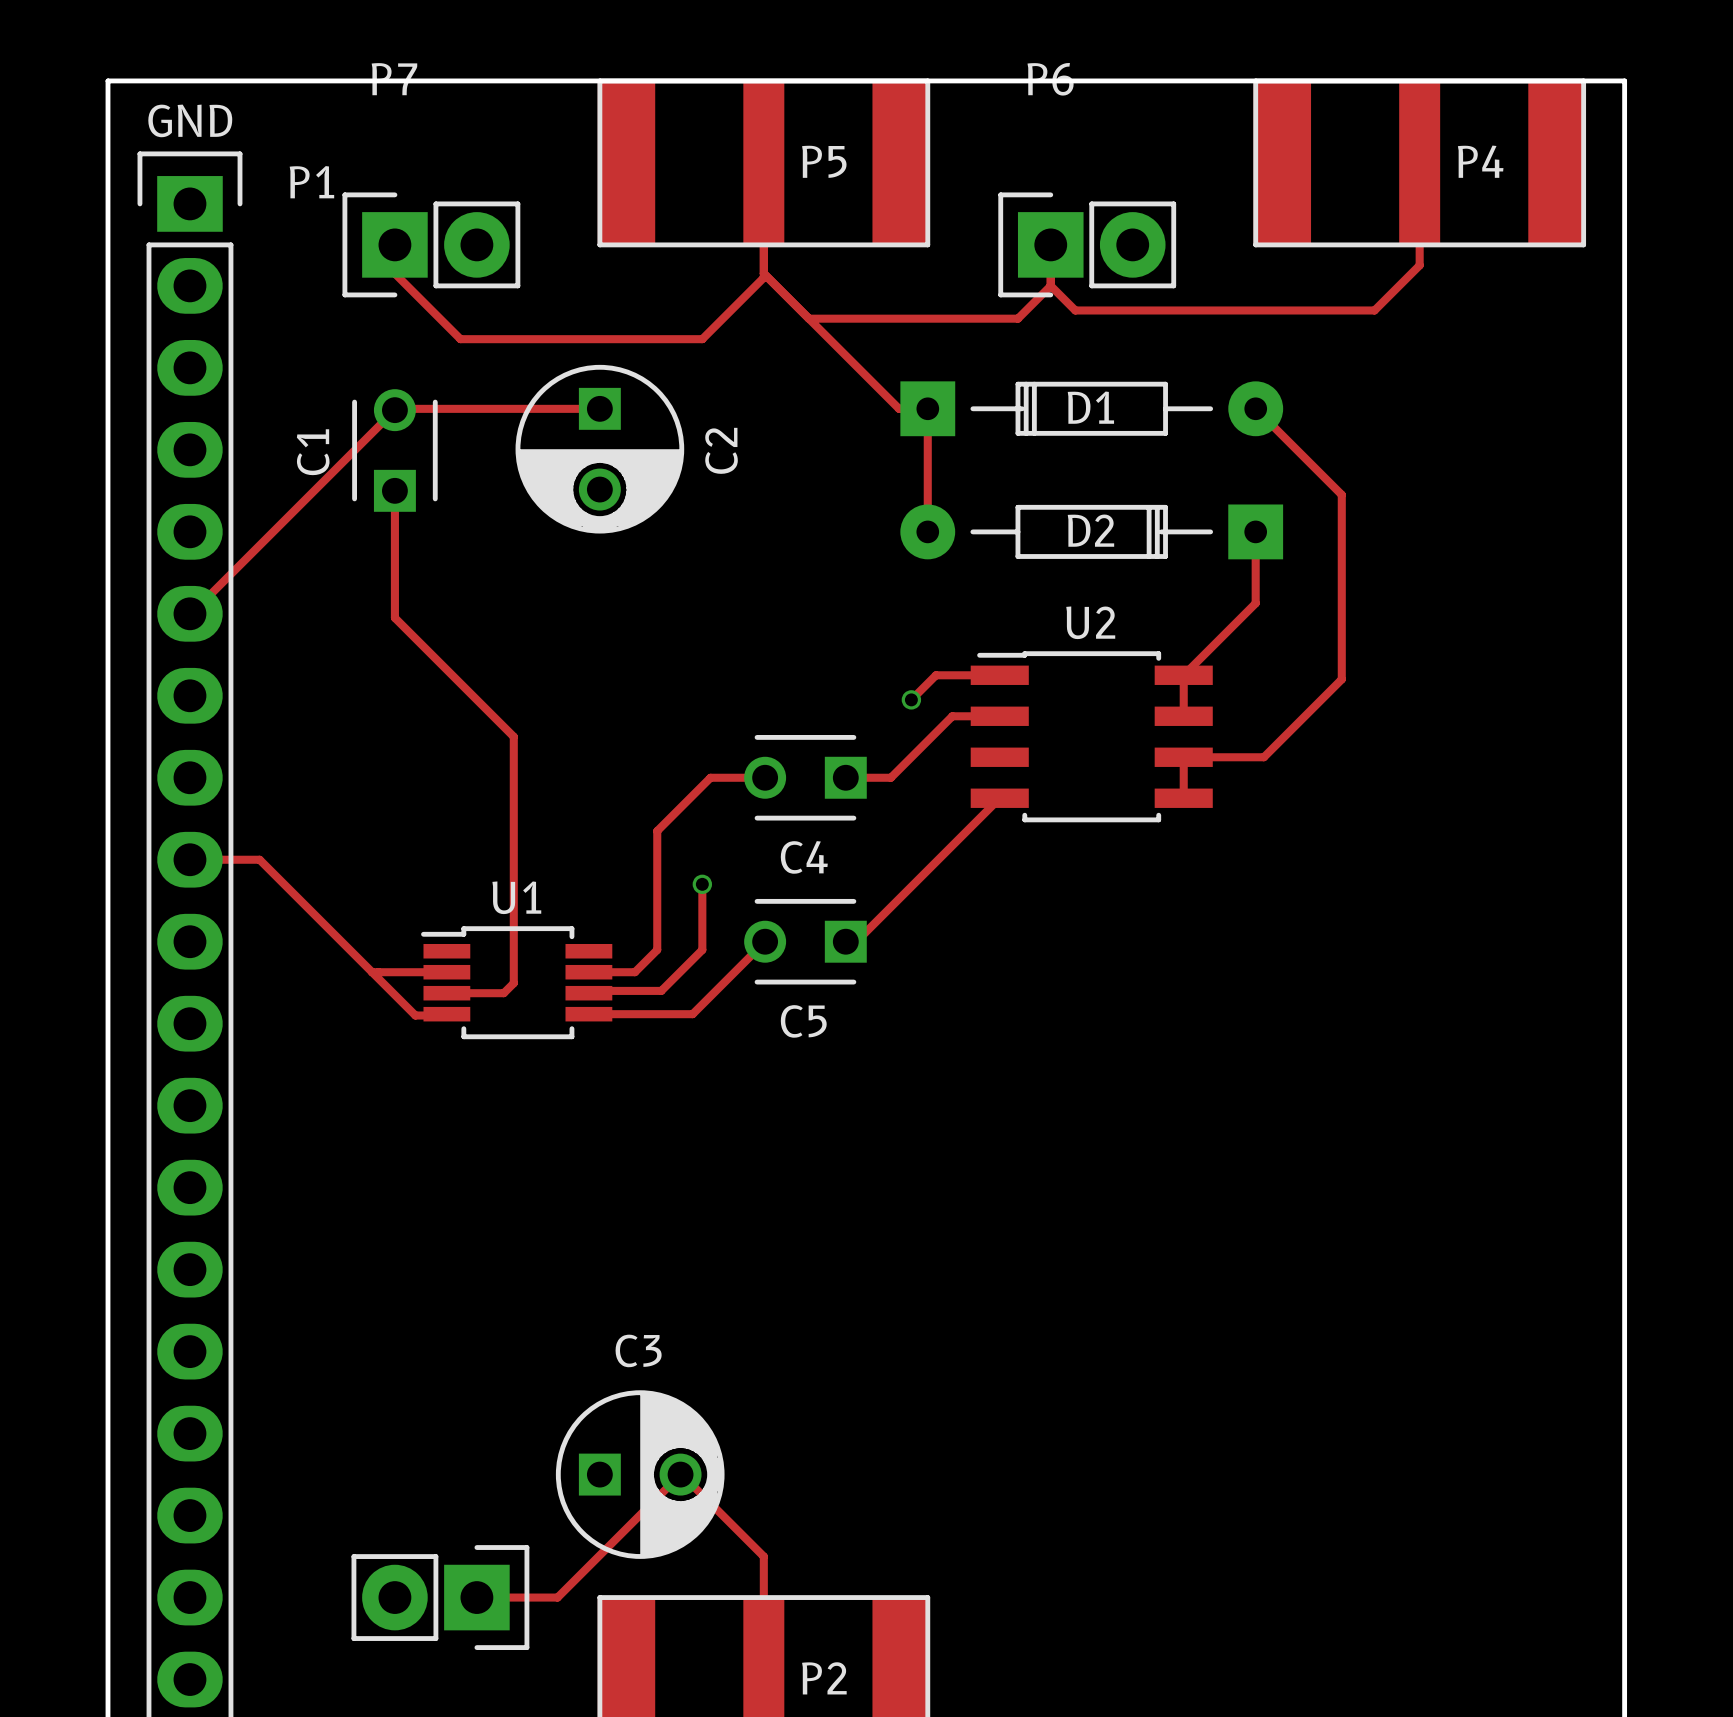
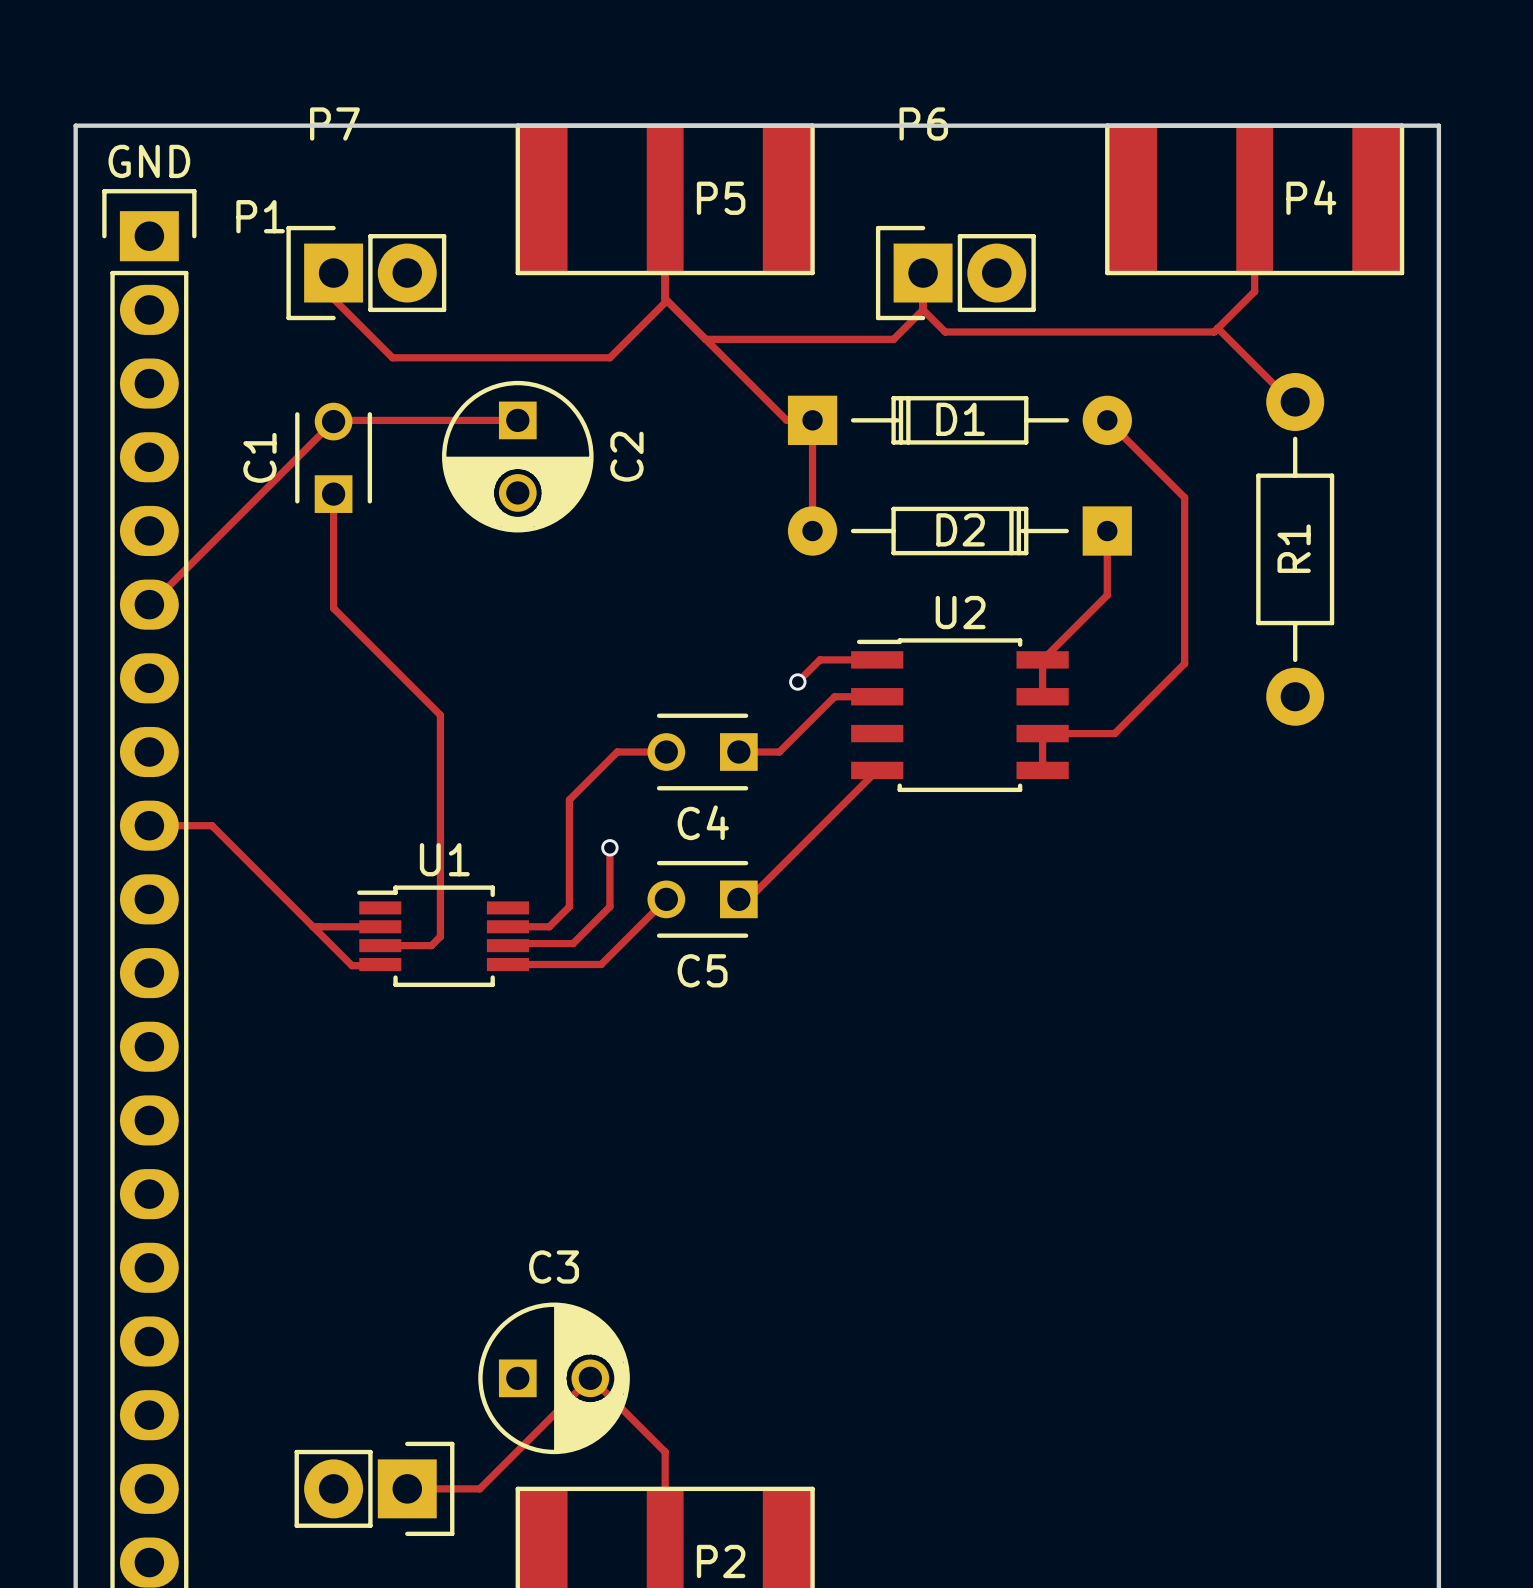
track: none -> (1217, 328) (1291, 401) (1295, 401)
R1: none -> (1295, 549)

